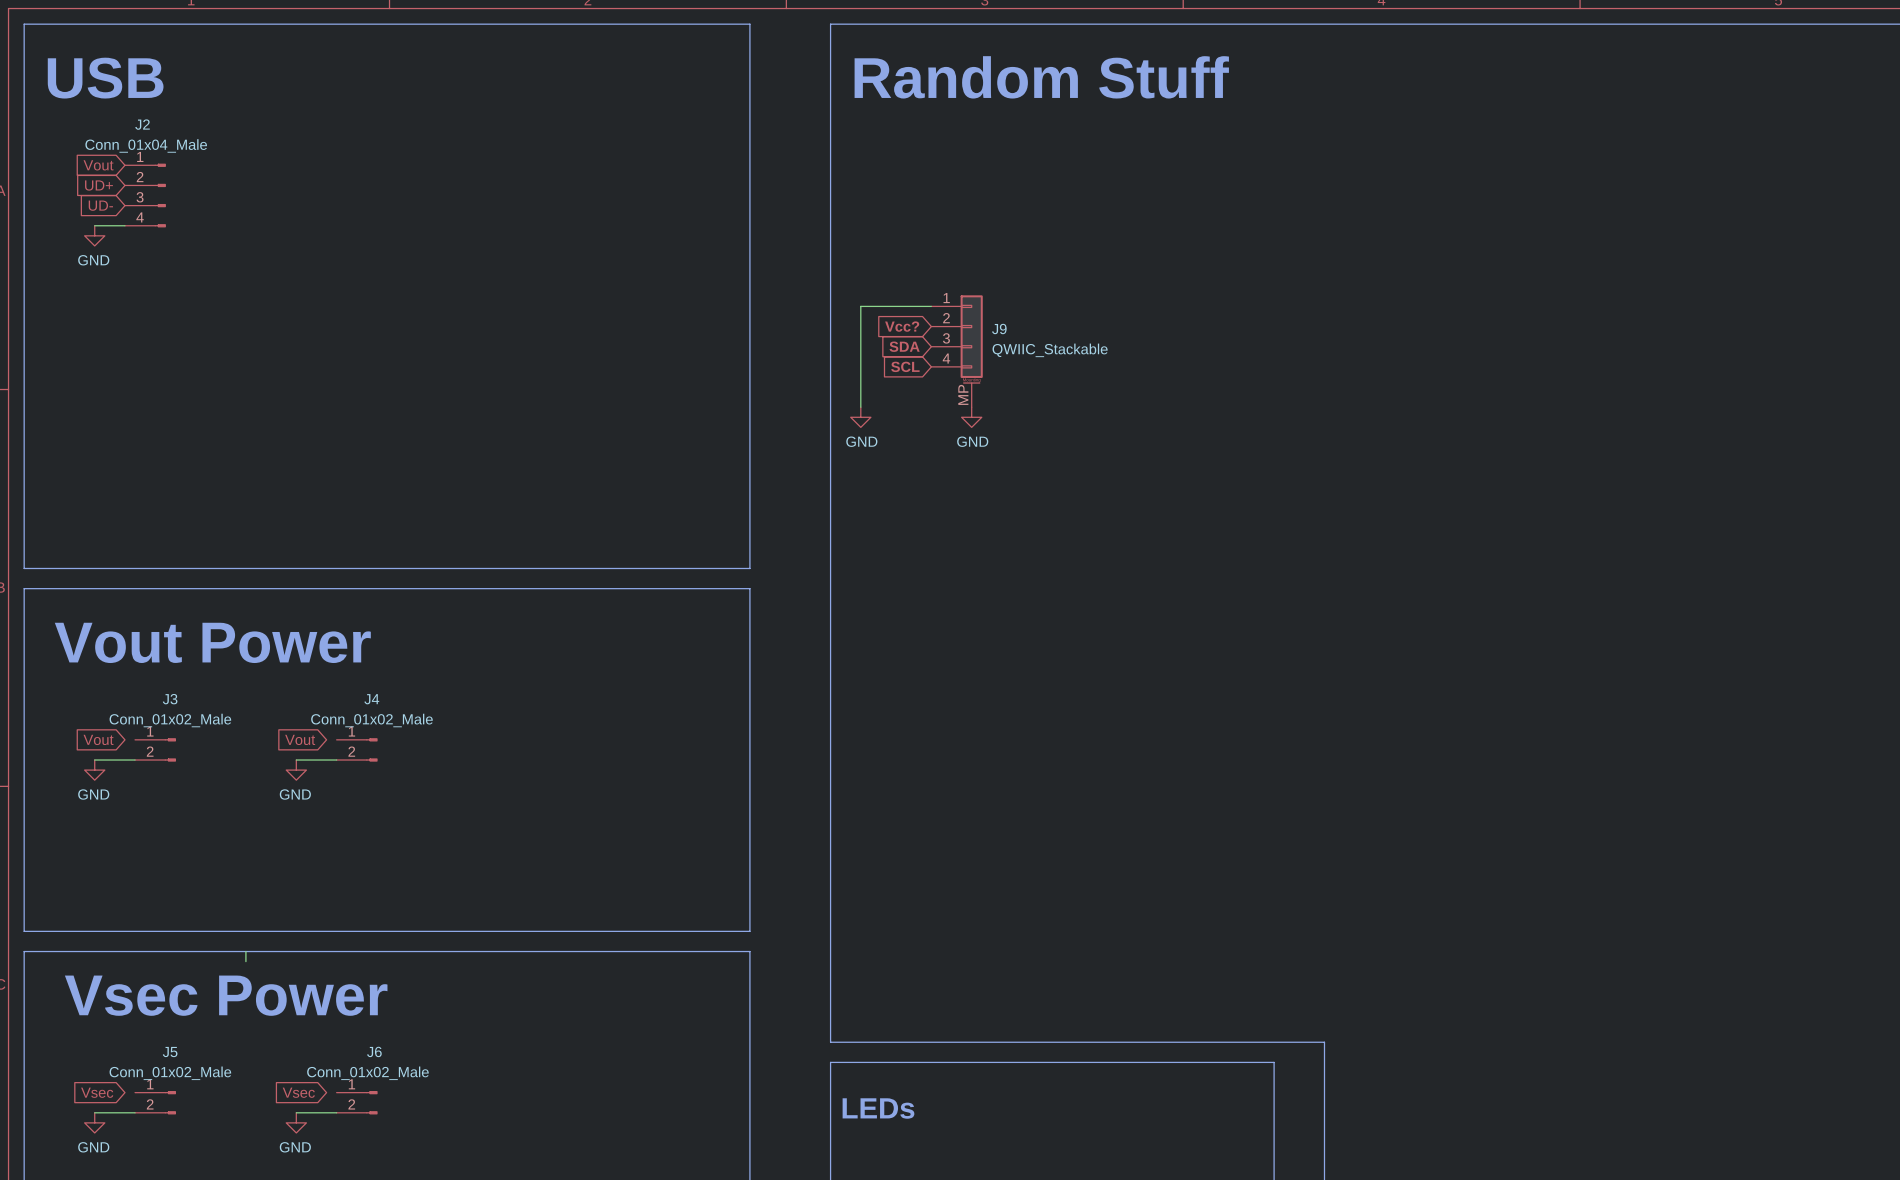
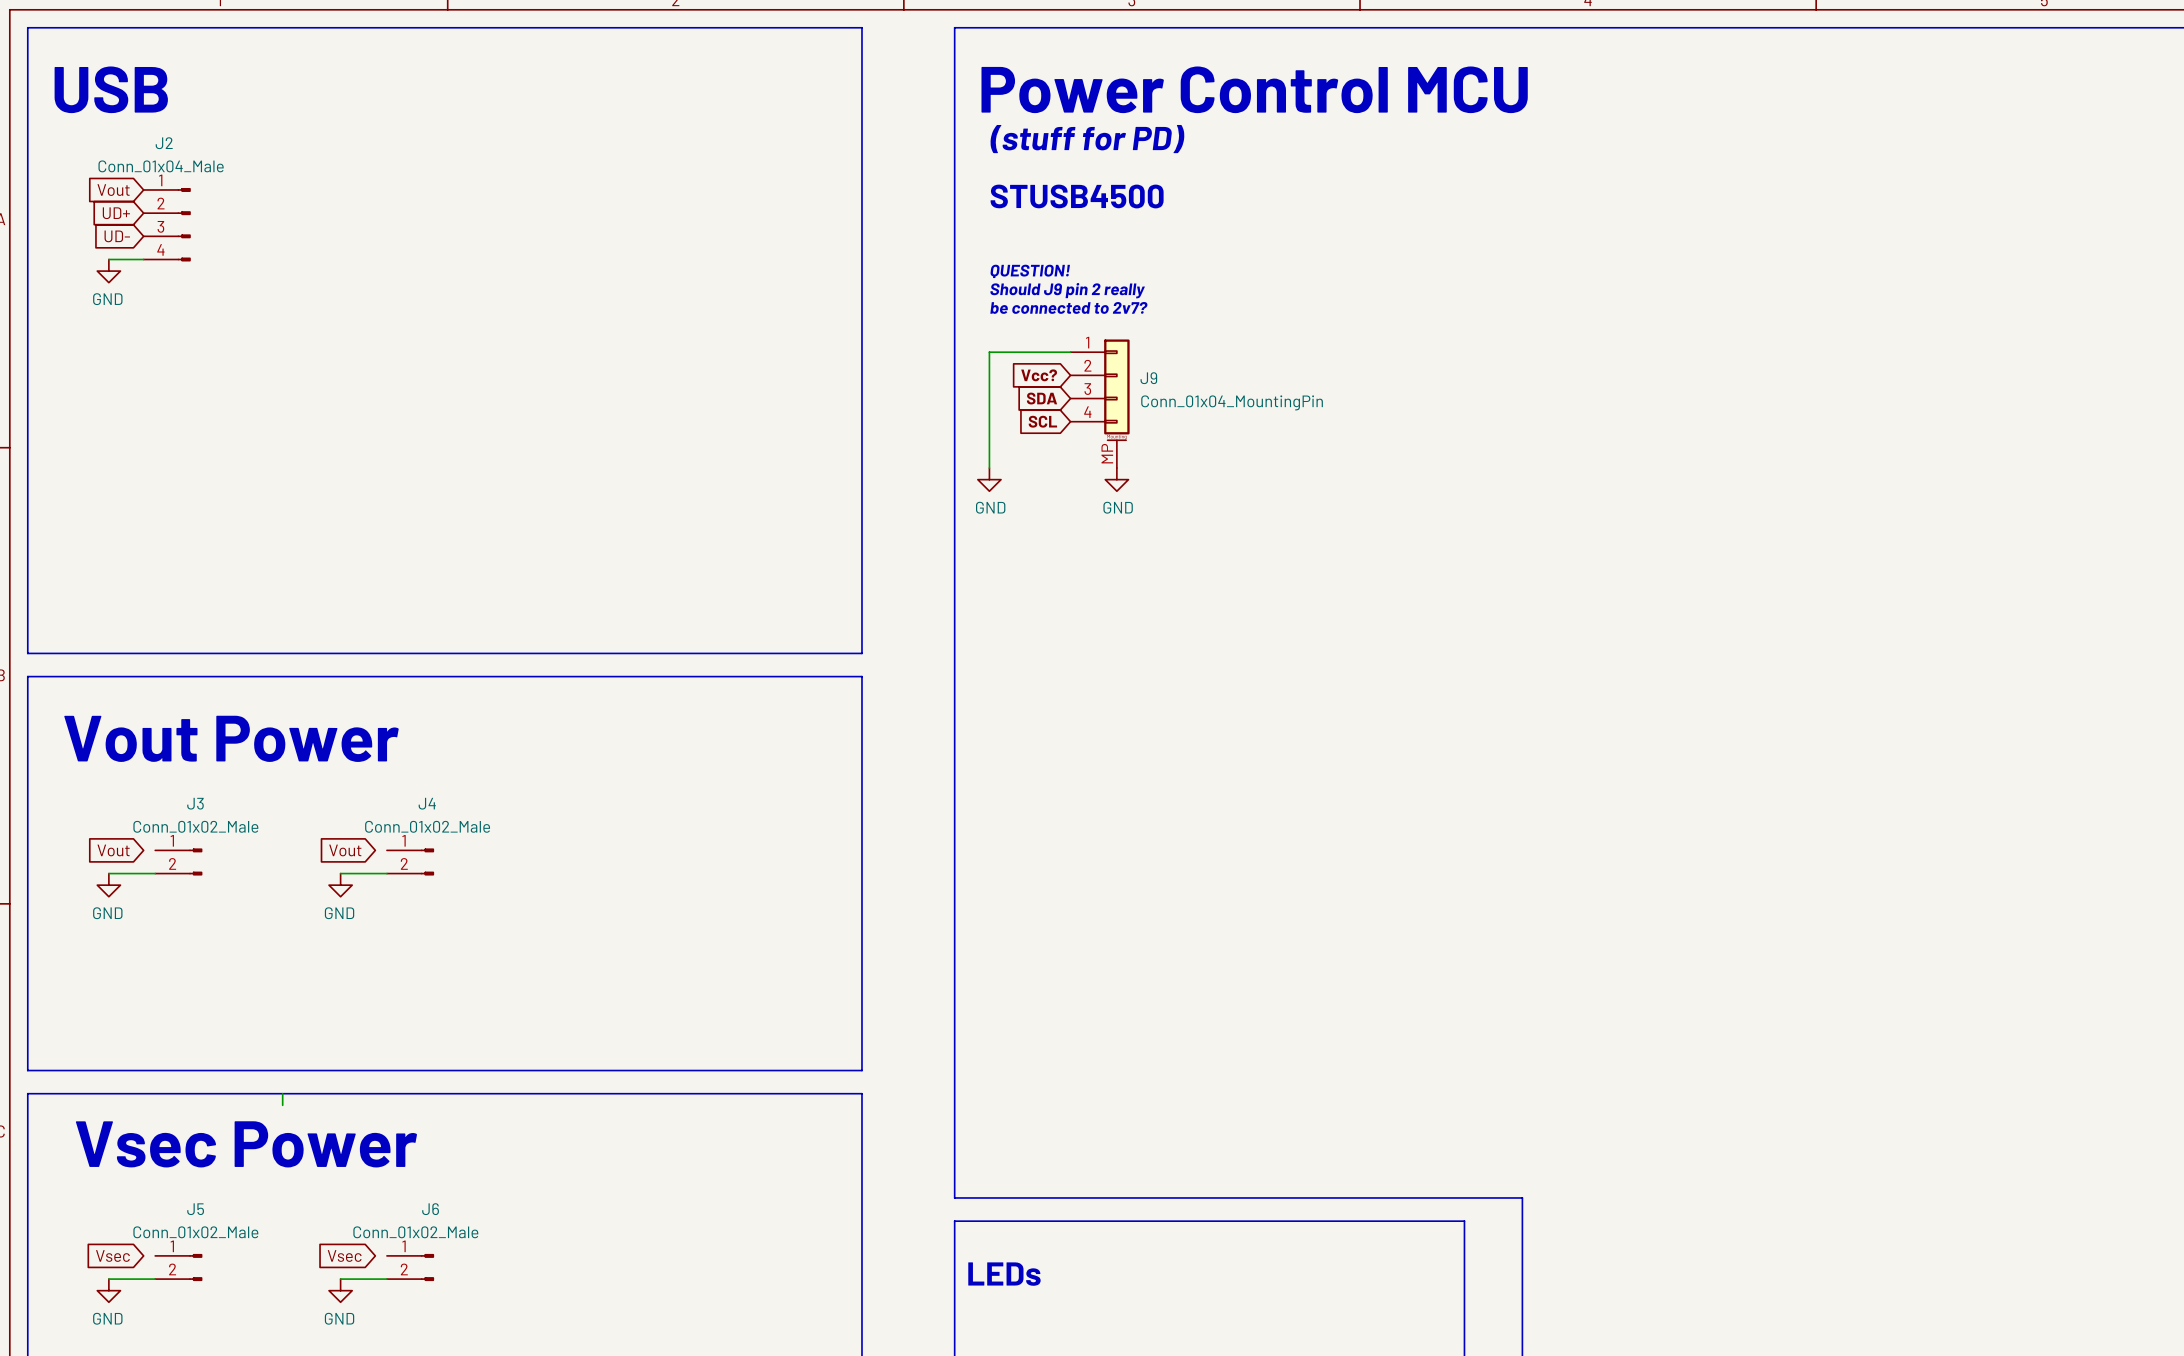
text: Random Stuff (1041, 77) -> Power Control MCU (1254, 89)
text: none -> (stuff for PD) (1087, 139)
text: none -> STUSB4500 (1077, 196)
text: none -> QUESTION! (1030, 271)
text: none -> Should J9 pin 2 really (1067, 290)
text: none -> be connected to 2v7? (1068, 307)
J9 value: QWIIC_Stackable (1050, 350) -> Conn_01x04_MountingPin (1232, 402)

